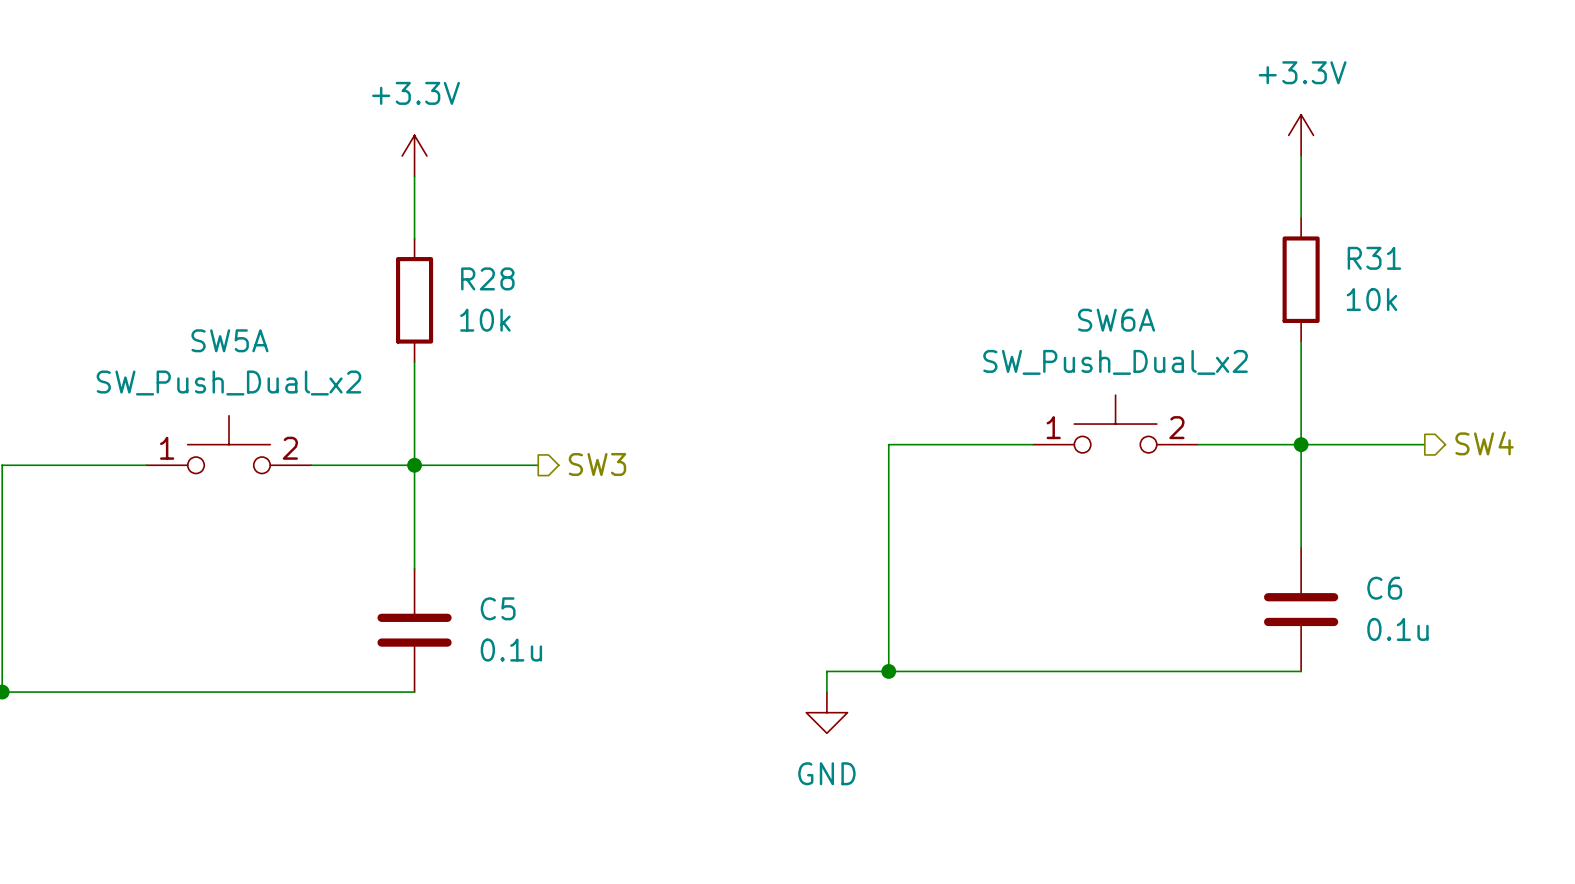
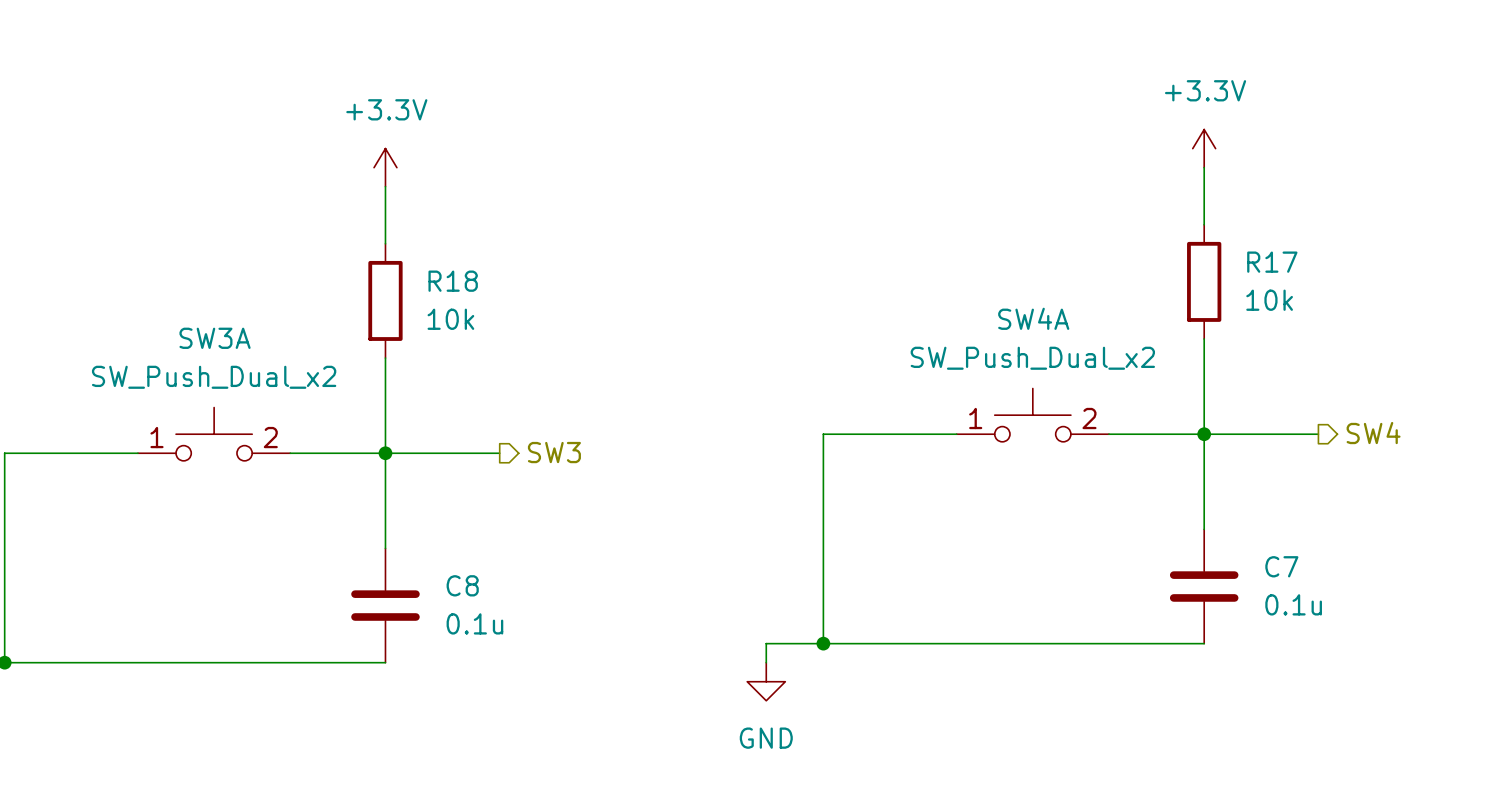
R31 name: R31 (1374, 258) -> R17 (1272, 262)
R28 name: R28 (487, 278) -> R18 (453, 281)
SW6A name: SW6A (1116, 320) -> SW4A (1033, 318)
SW5A name: SW5A (229, 340) -> SW3A (215, 338)
C6 name: C6 (1384, 588) -> C7 (1281, 566)
C5 name: C5 (498, 608) -> C8 (462, 585)

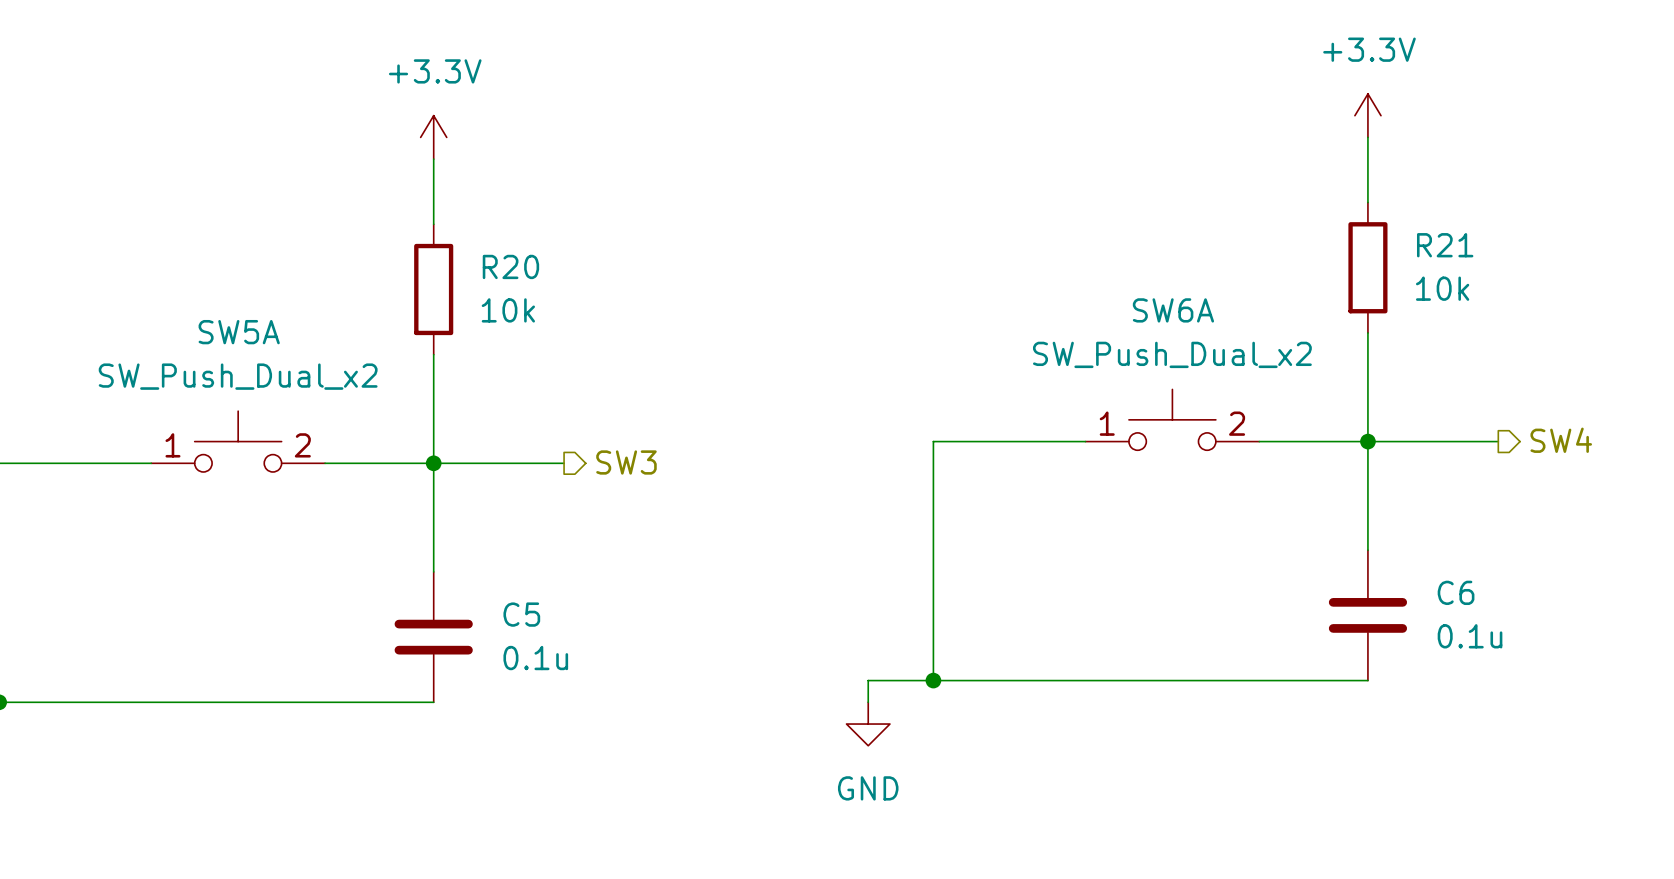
R17 name: R17 (1272, 262) -> R21 (1445, 245)
R18 name: R18 (453, 281) -> R20 (510, 266)
SW4A name: SW4A (1033, 318) -> SW6A (1173, 310)
SW3A name: SW3A (215, 338) -> SW5A (239, 332)
C7 name: C7 (1281, 566) -> C6 (1456, 592)
C8 name: C8 (462, 585) -> C5 (521, 614)

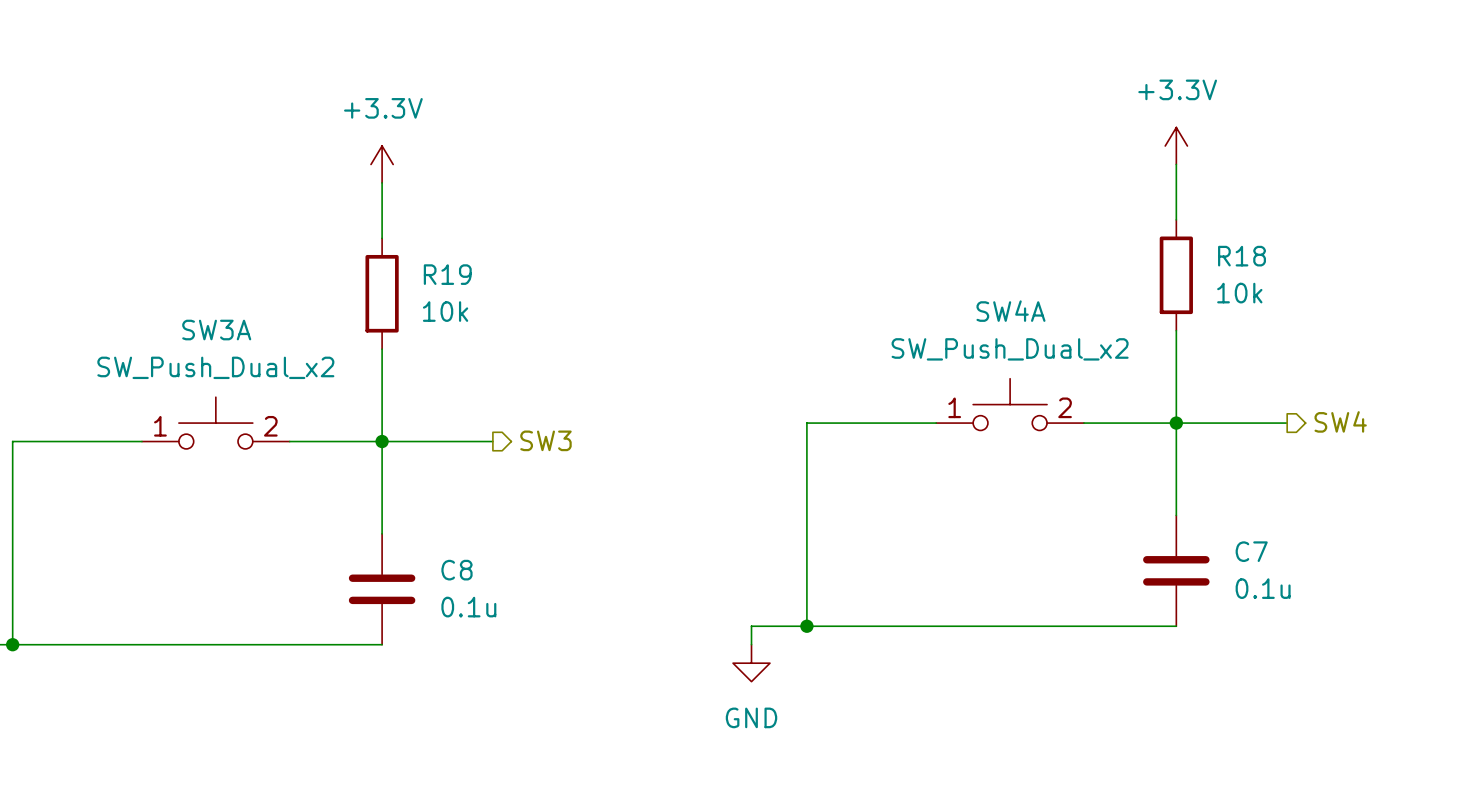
R21 name: R21 (1445, 245) -> R18 (1242, 256)
R20 name: R20 (510, 266) -> R19 (447, 274)
SW6A name: SW6A (1173, 310) -> SW4A (1010, 311)
SW5A name: SW5A (239, 332) -> SW3A (216, 330)
C6 name: C6 (1456, 592) -> C7 (1251, 551)
C5 name: C5 (521, 614) -> C8 (456, 570)

